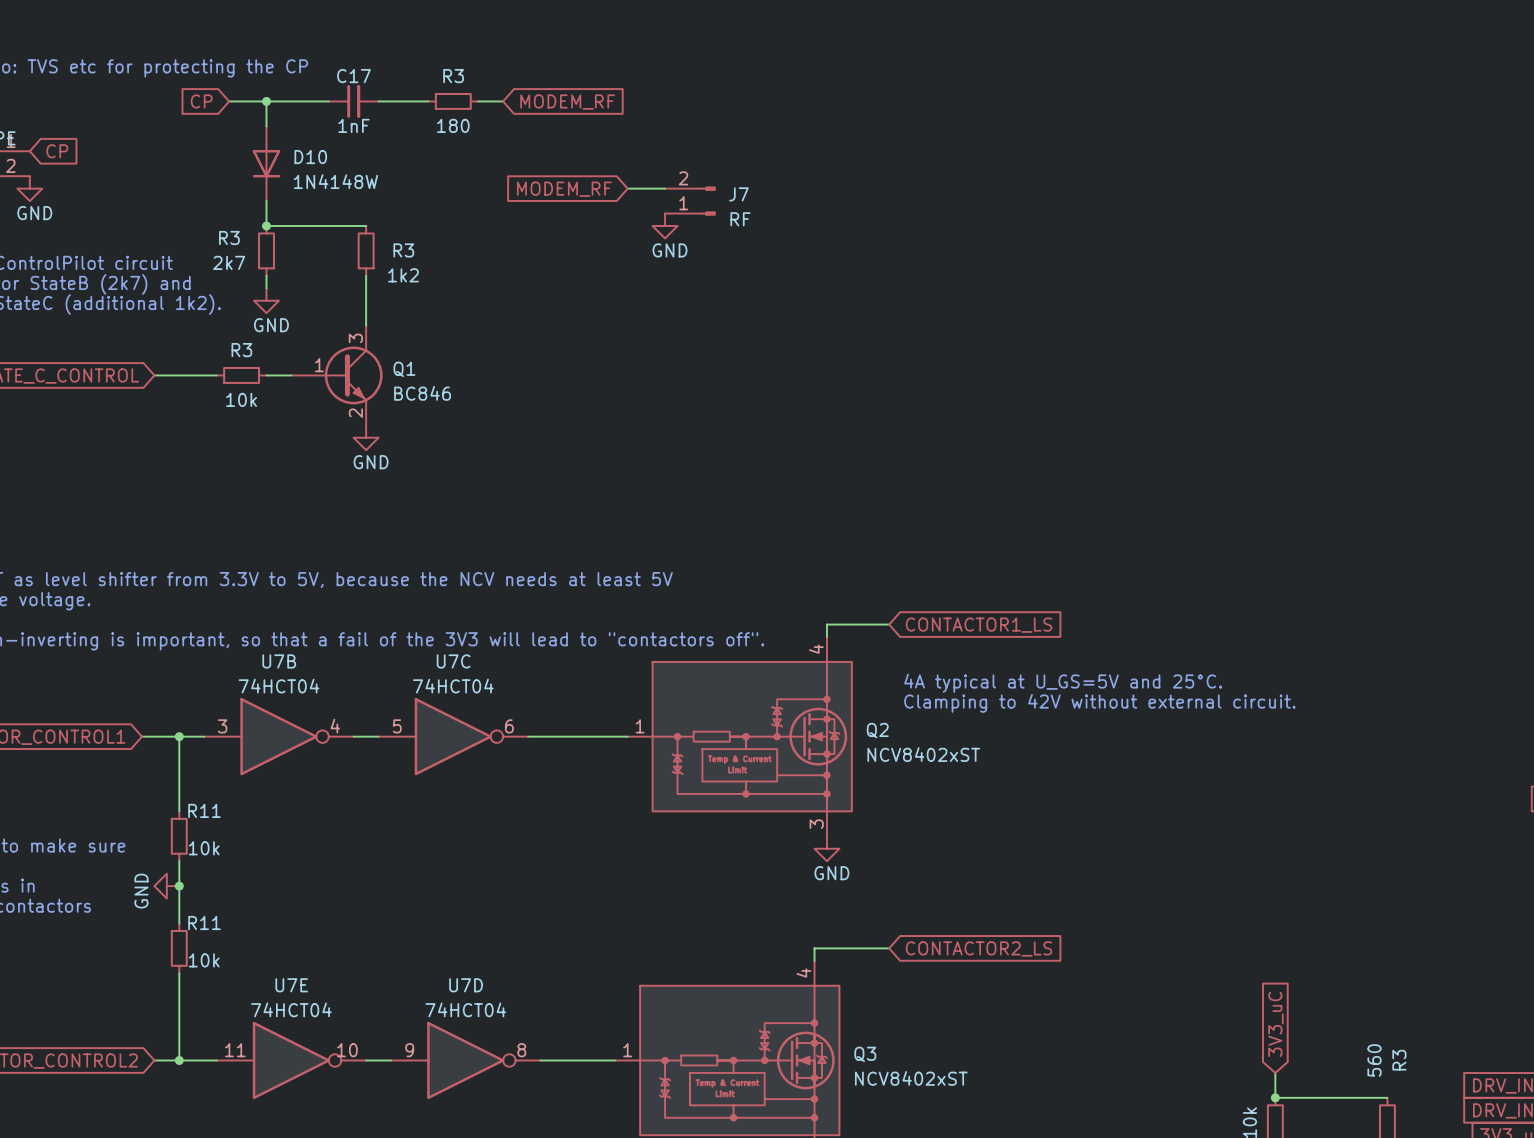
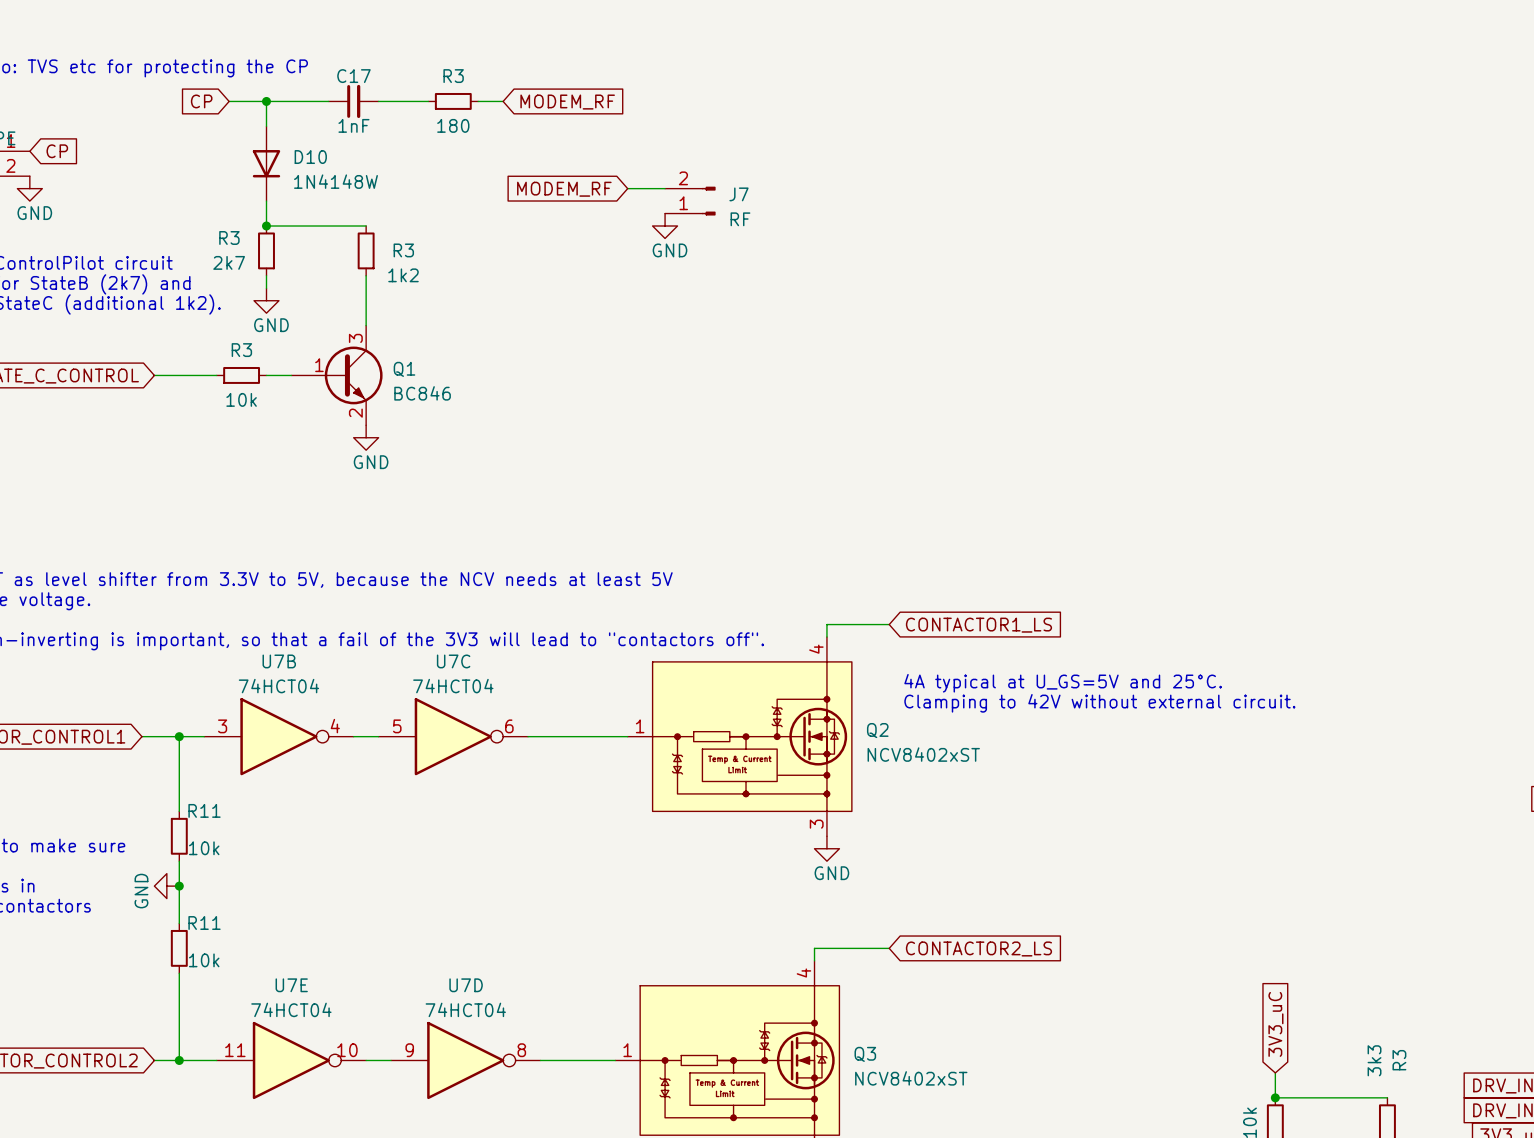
R3 value: 560 (1374, 1060) -> 3k3 (1374, 1060)

